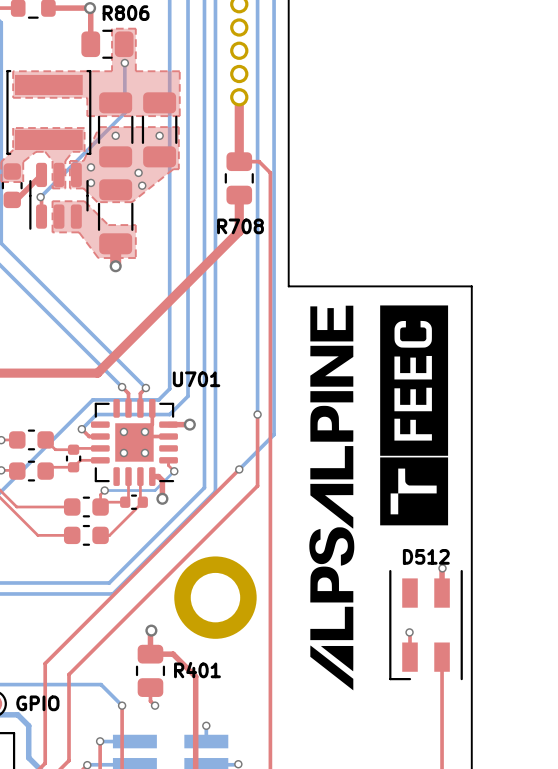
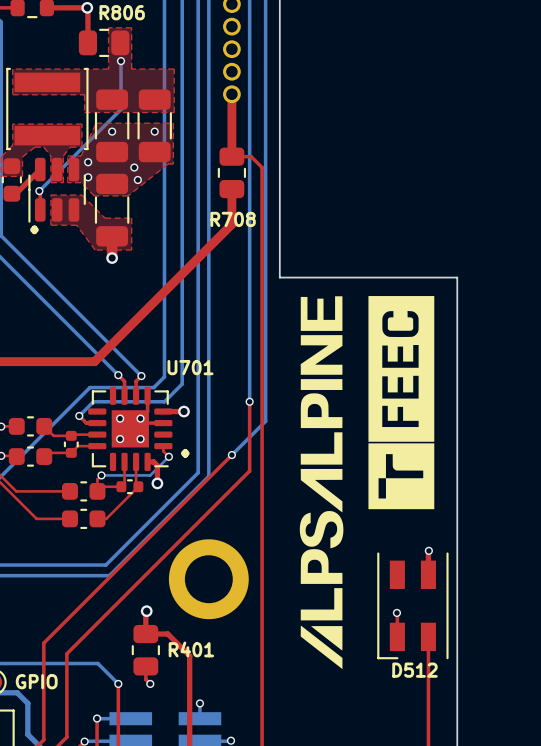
text: none -> . (34, 229)
text: none -> . (185, 453)
D512 name position: D512 (426, 556) -> D512 (414, 670)

